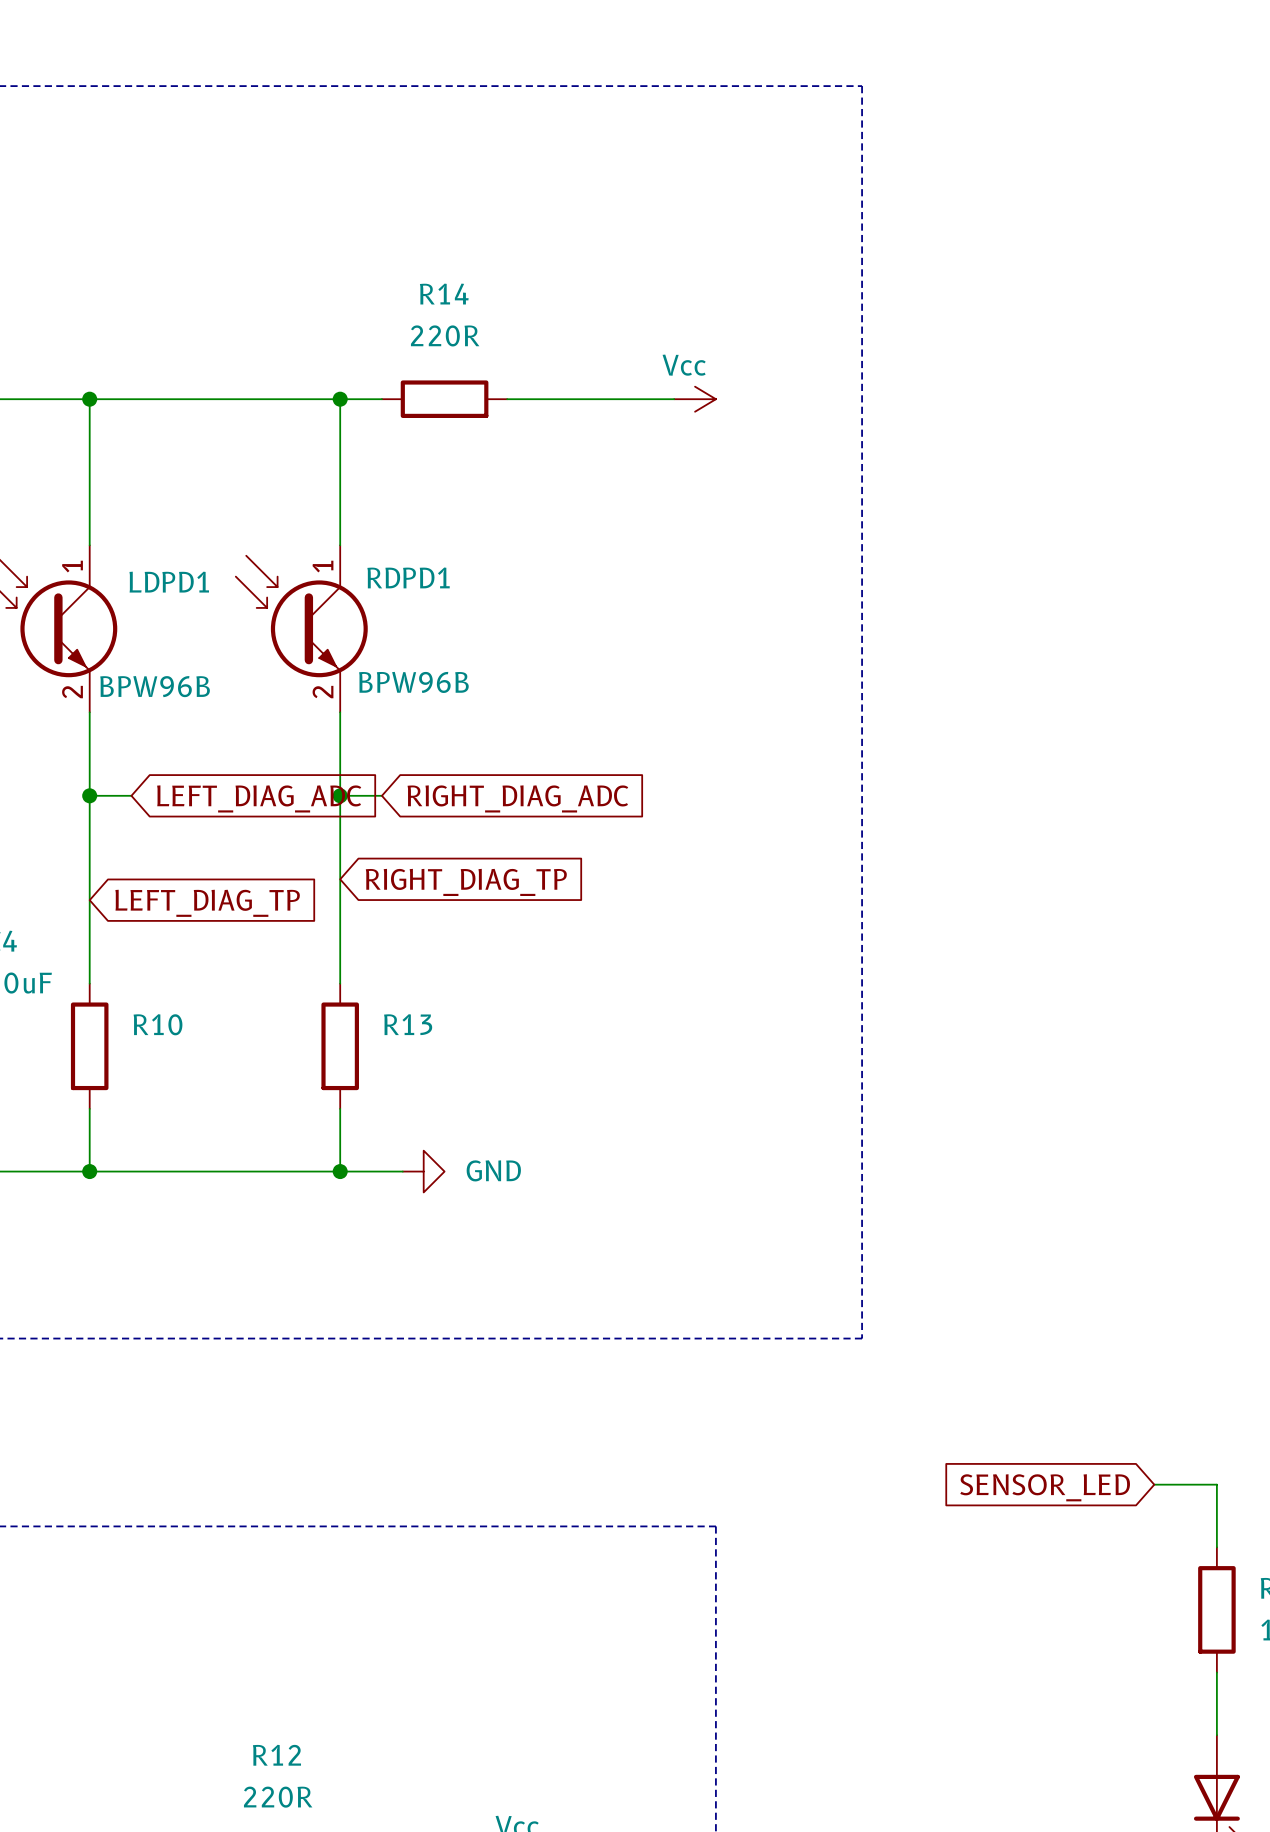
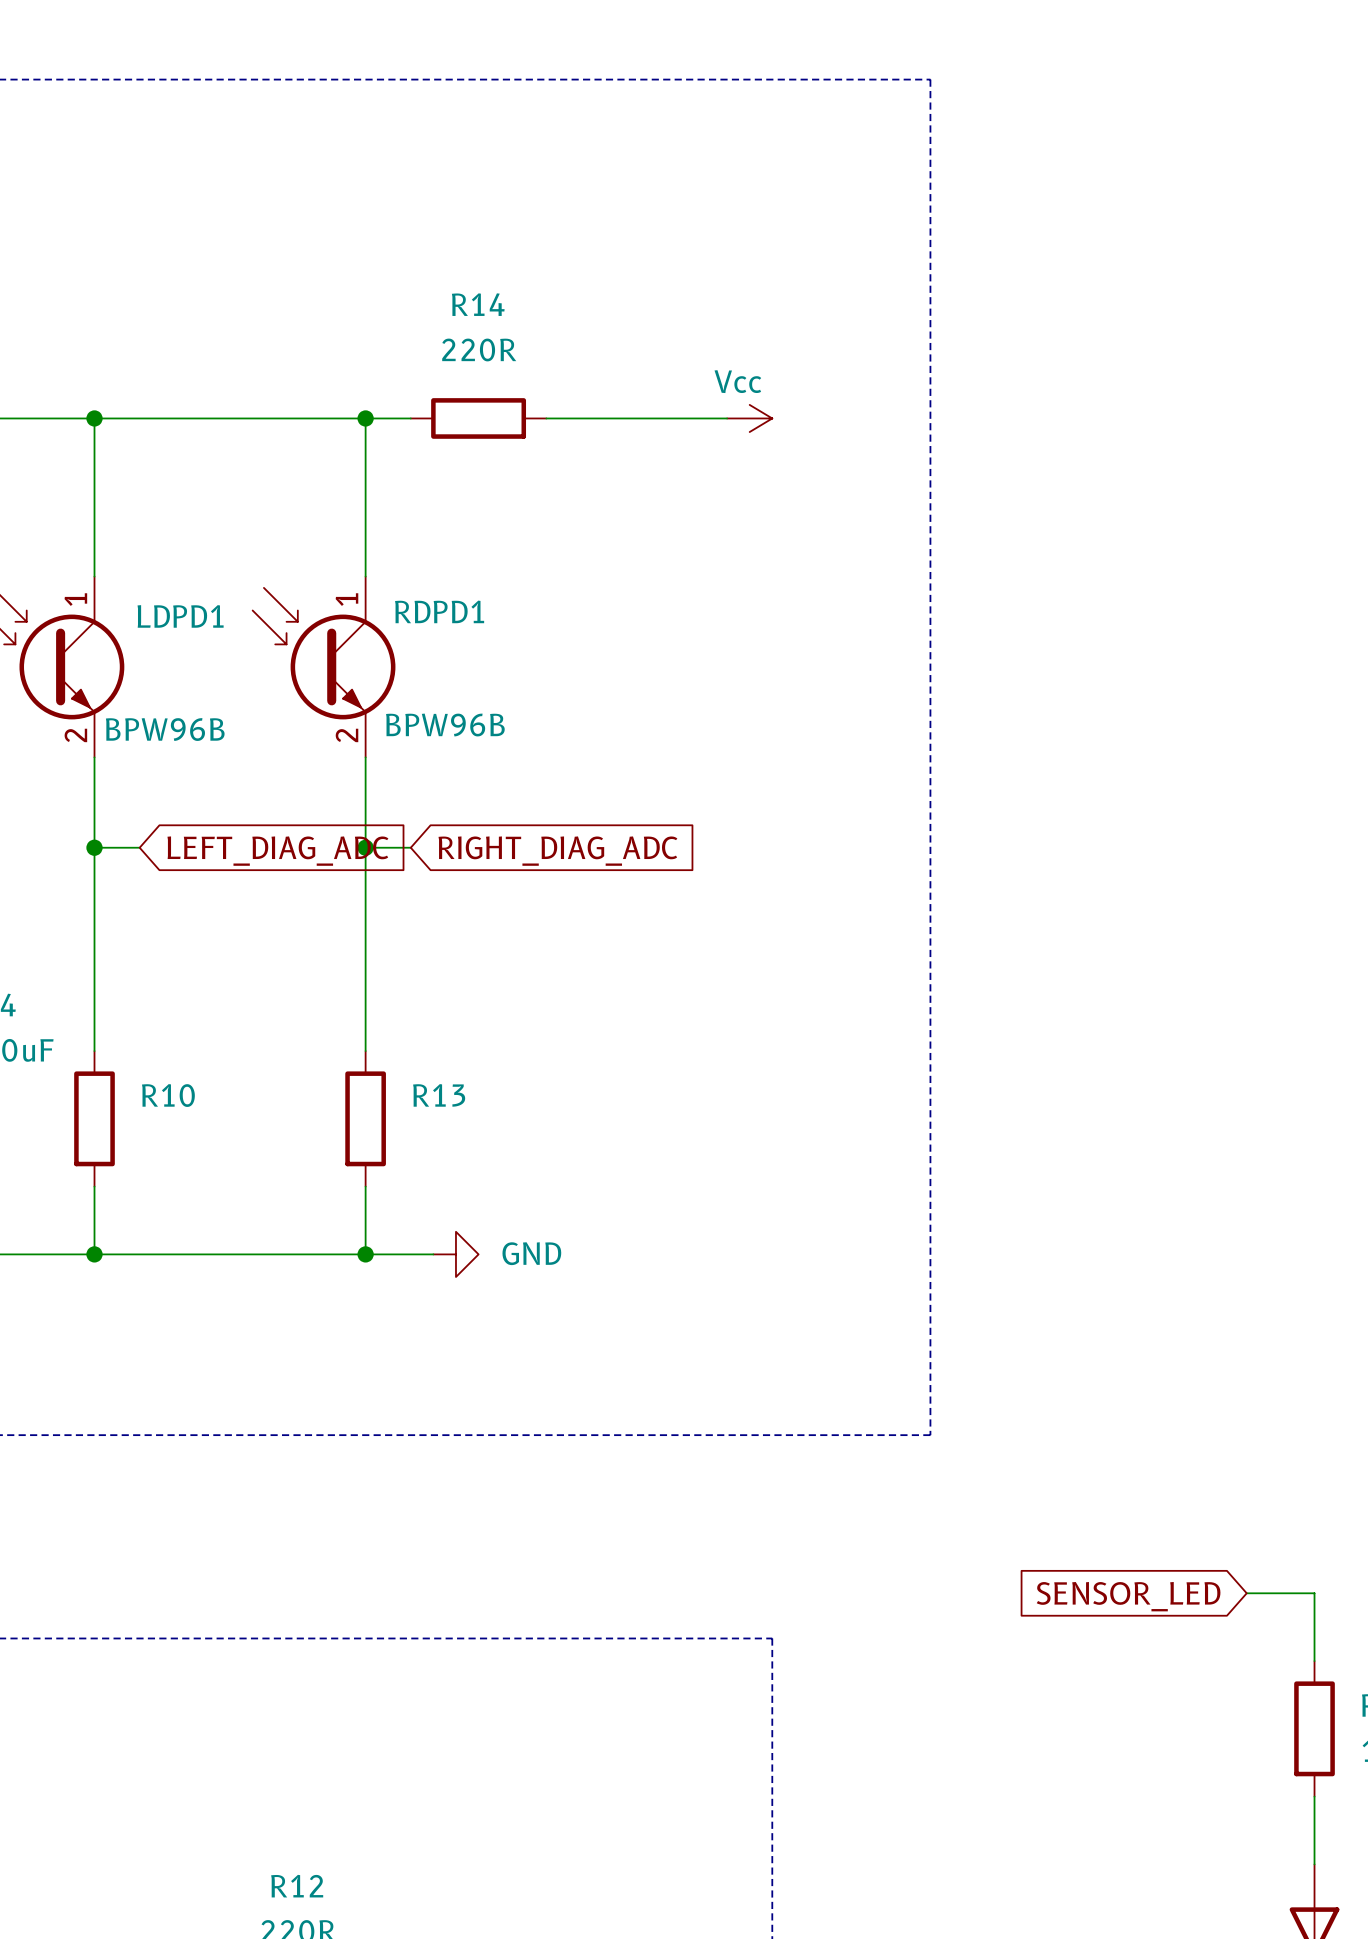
global label: RIGHT_DIAG_TP (466, 882) -> none
global label: LEFT_DIAG_TP (207, 903) -> none

